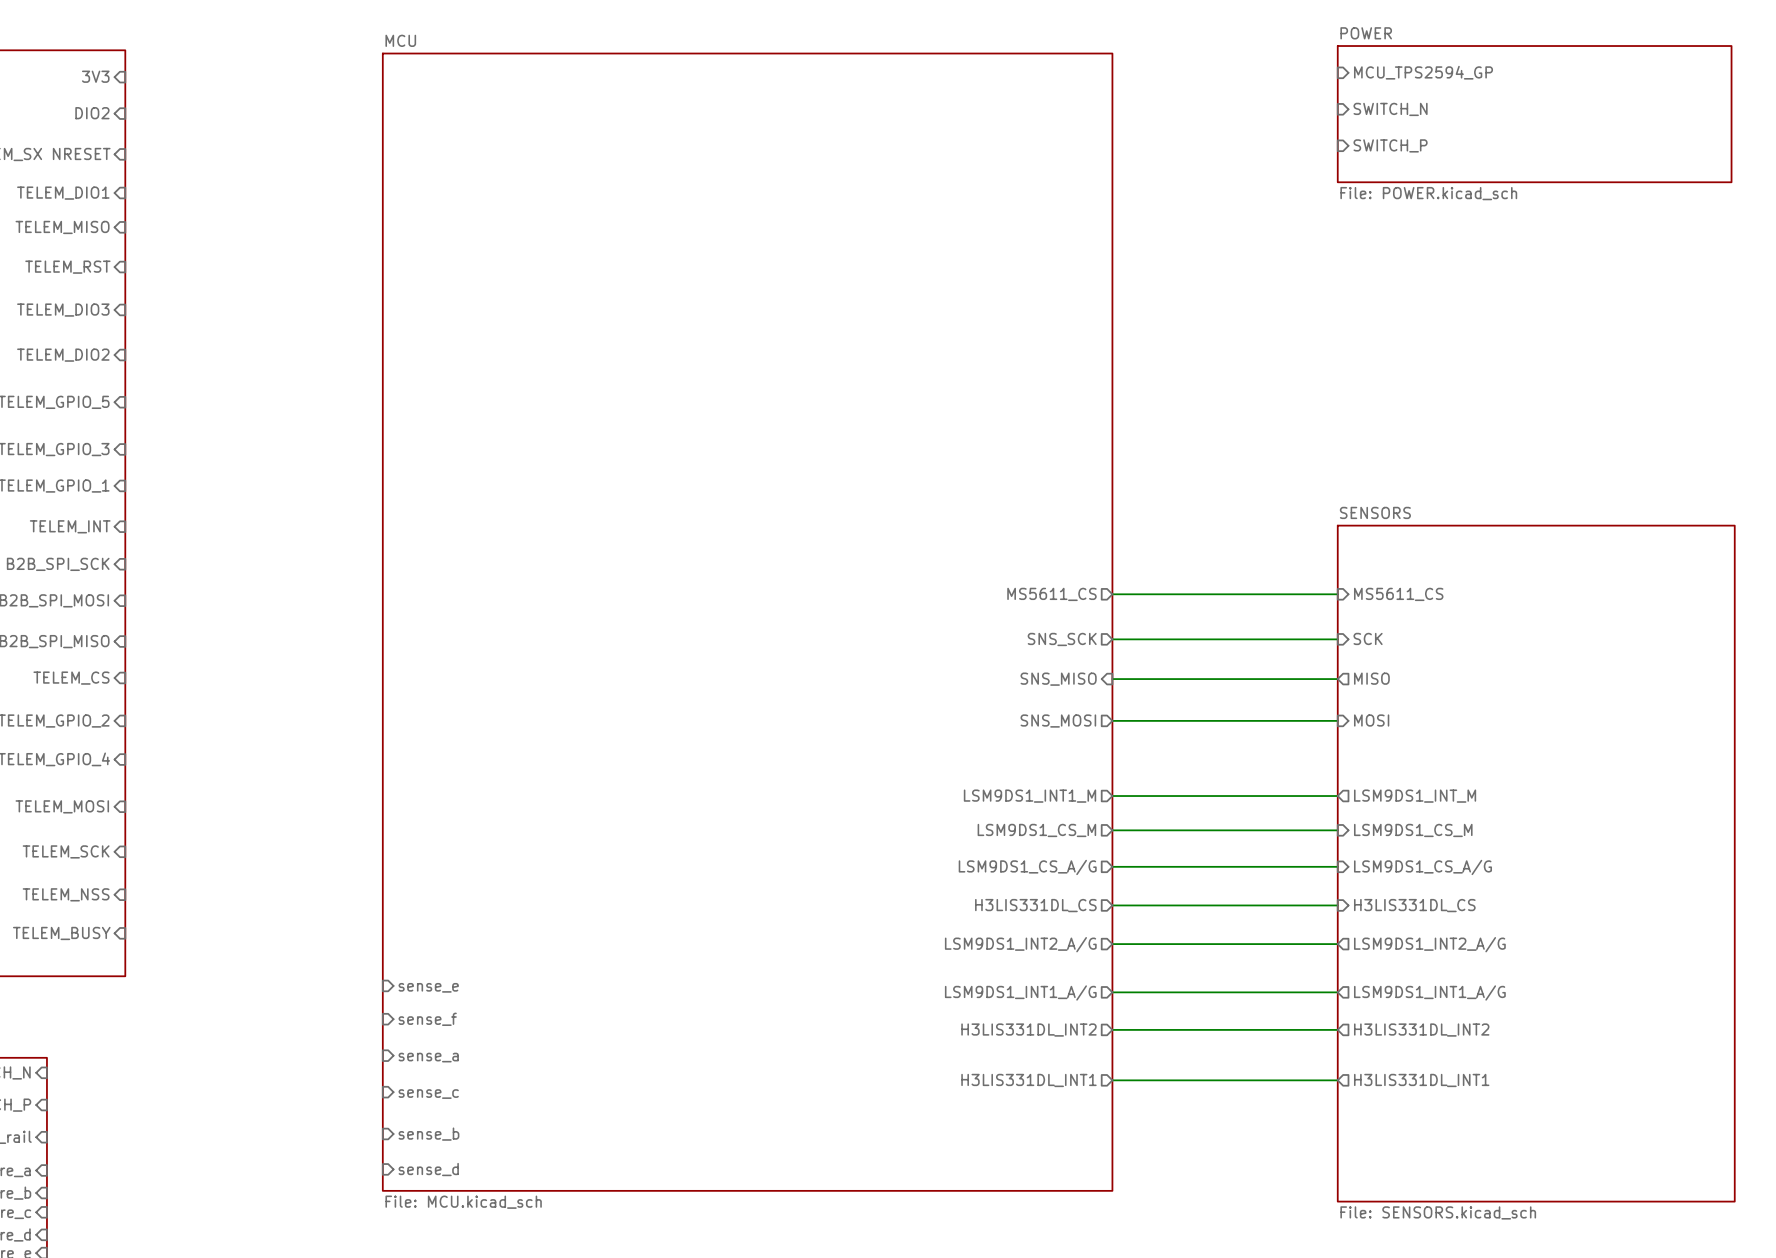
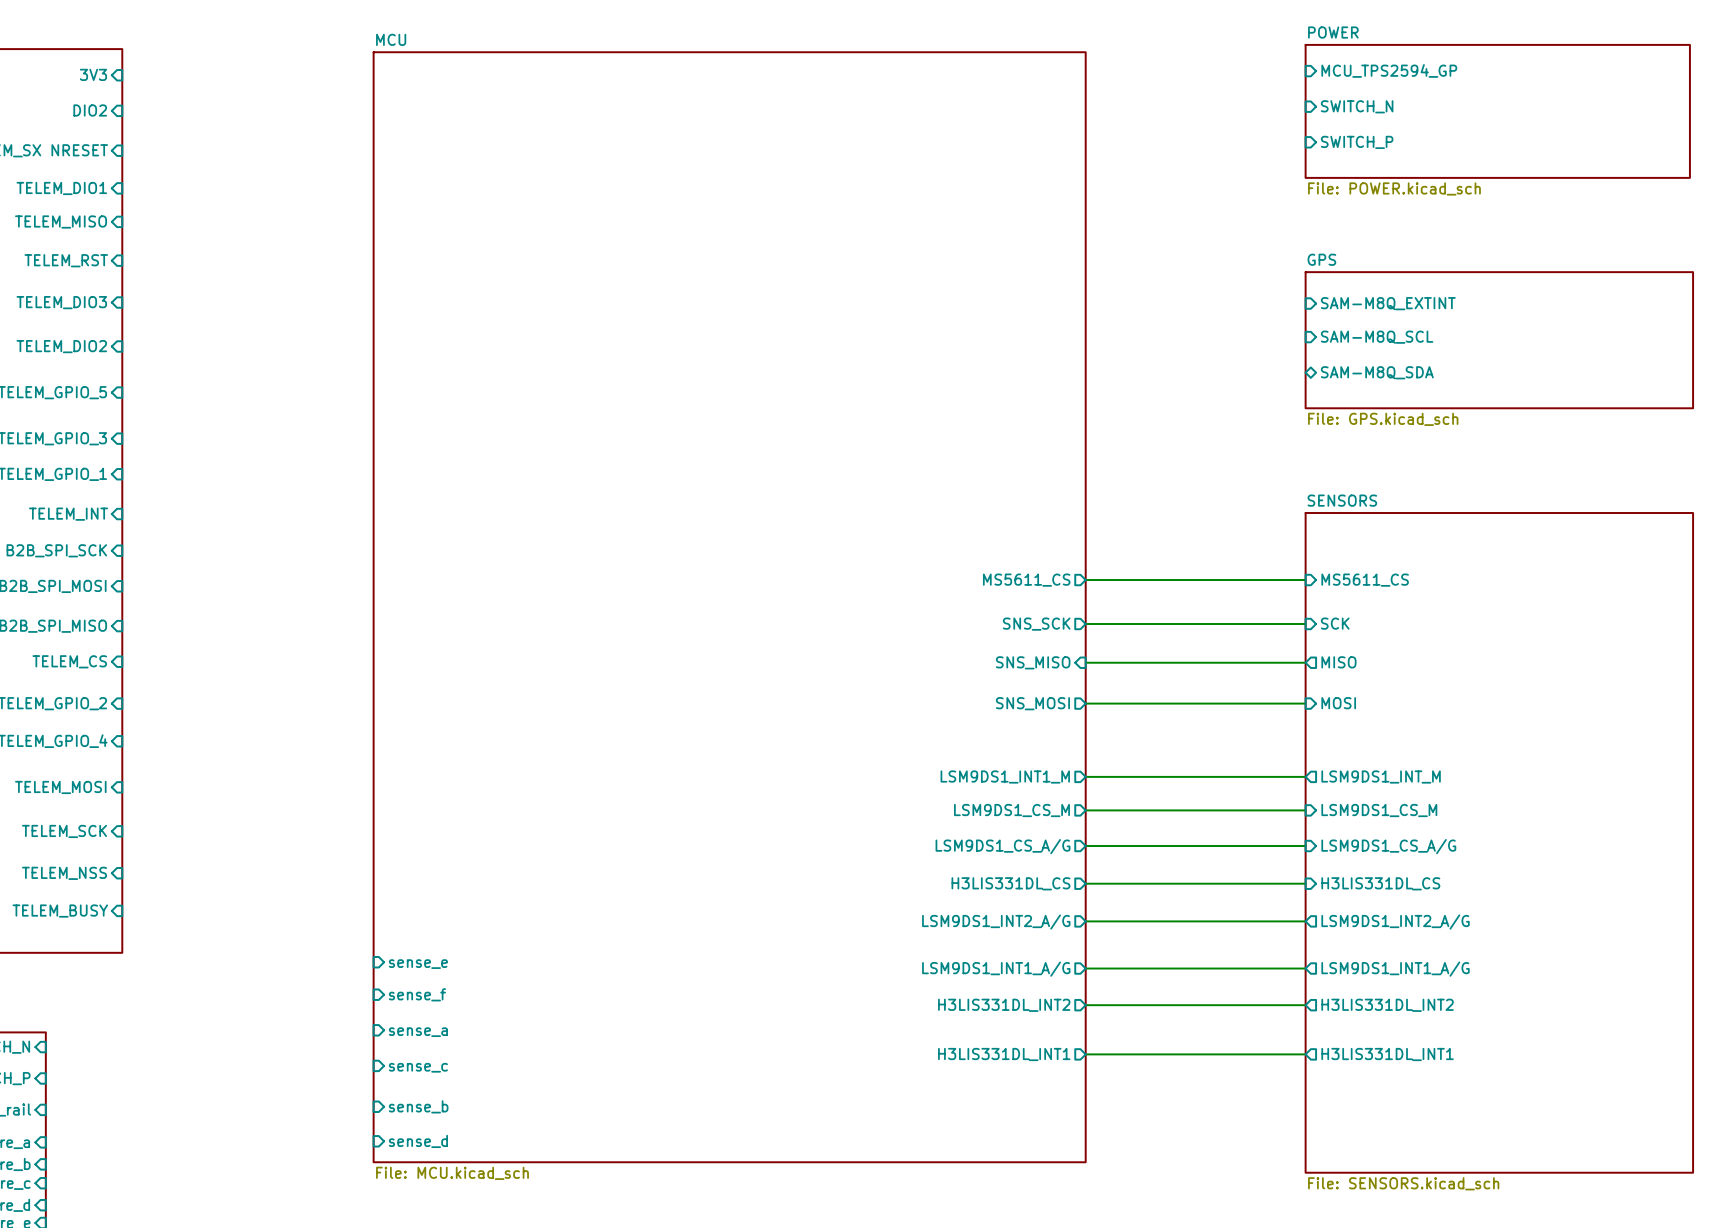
sheet pin: none -> SAM-M8Q_EXTINT (1388, 303)
sheet pin: none -> SAM-M8Q_SCL (1377, 337)
sheet GPS: none -> File: GPS.kicad_sch (1499, 340)
sheet pin: none -> SAM-M8Q_SDA (1377, 372)

